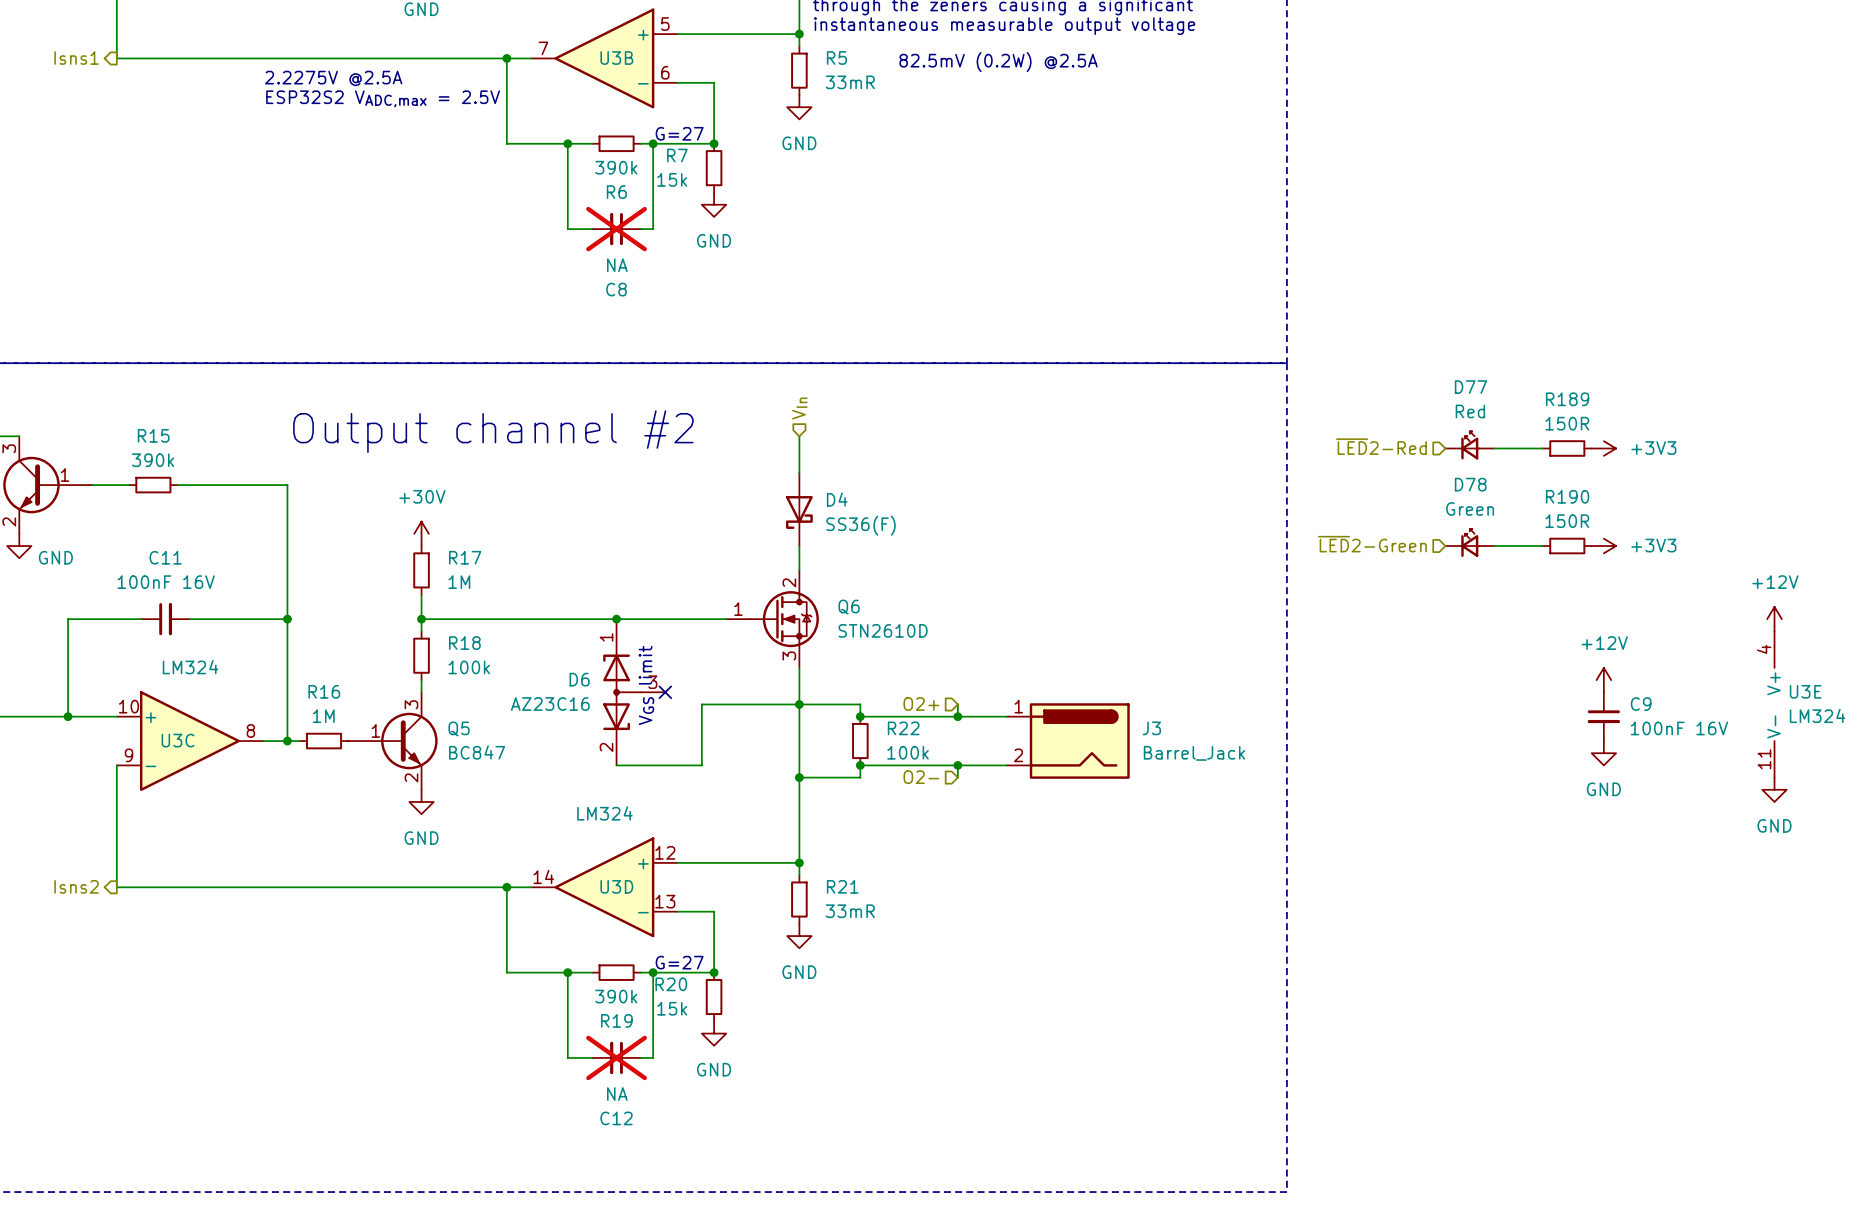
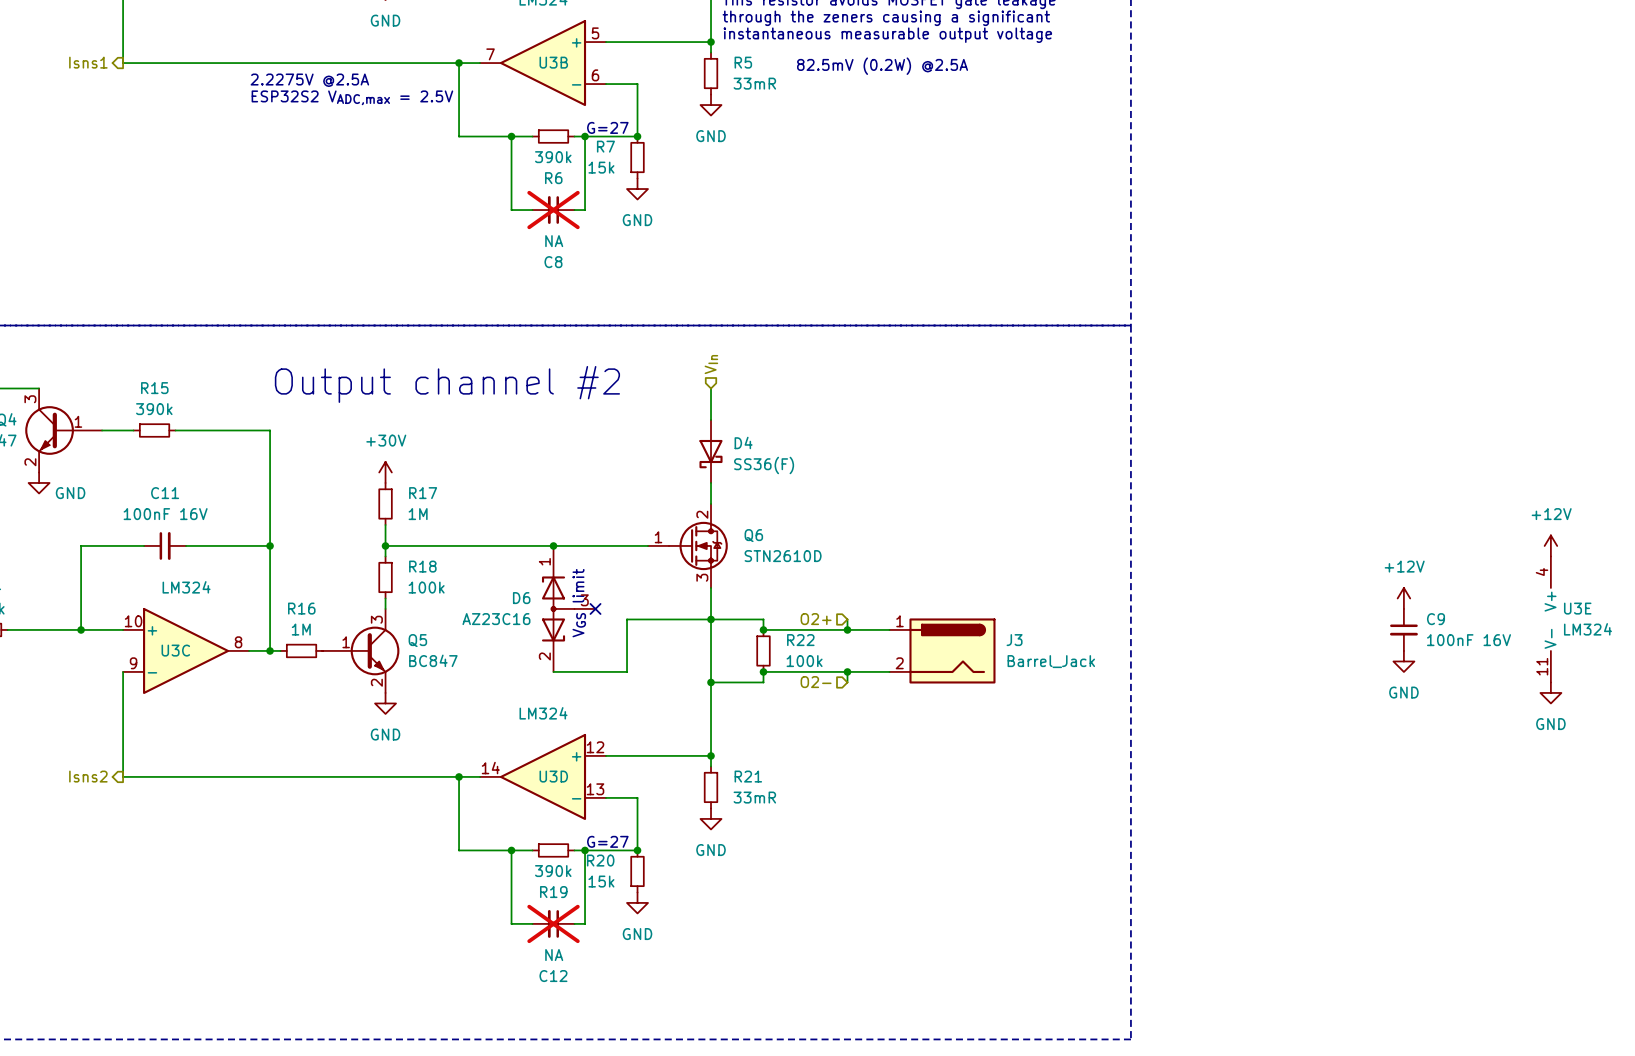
D77: Red (1469, 445) -> none
hierarchical label: ~{LED}2-Red (1381, 446) -> none
wire: (1494, 448) (1542, 448) -> none
R189: 150R (1567, 448) -> none
power symbol: +3V3 (1603, 448) -> none
D78: Green (1469, 542) -> none
hierarchical label: ~{LED}2-Green (1372, 544) -> none
wire: (1494, 546) (1542, 546) -> none
R190: 150R (1567, 546) -> none
power symbol: +3V3 (1603, 546) -> none

